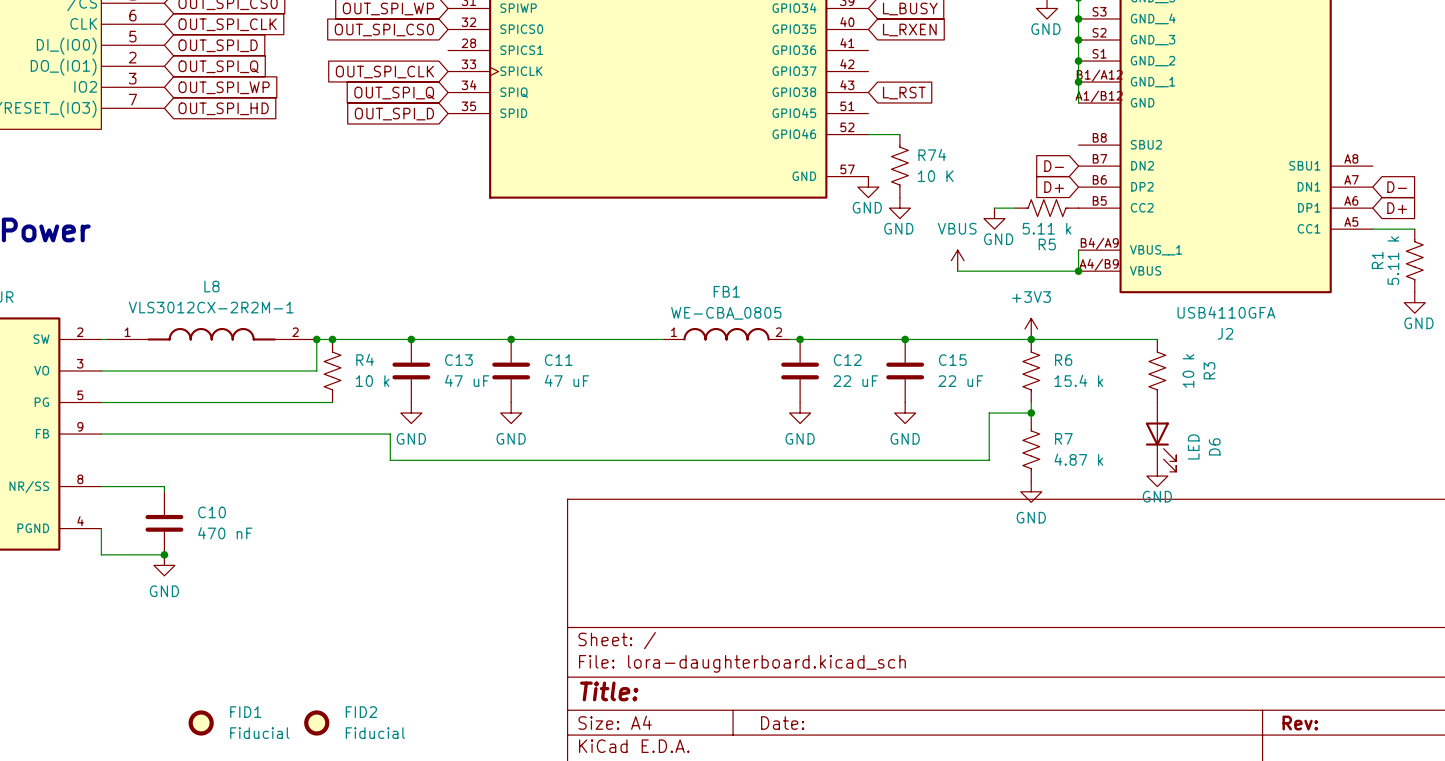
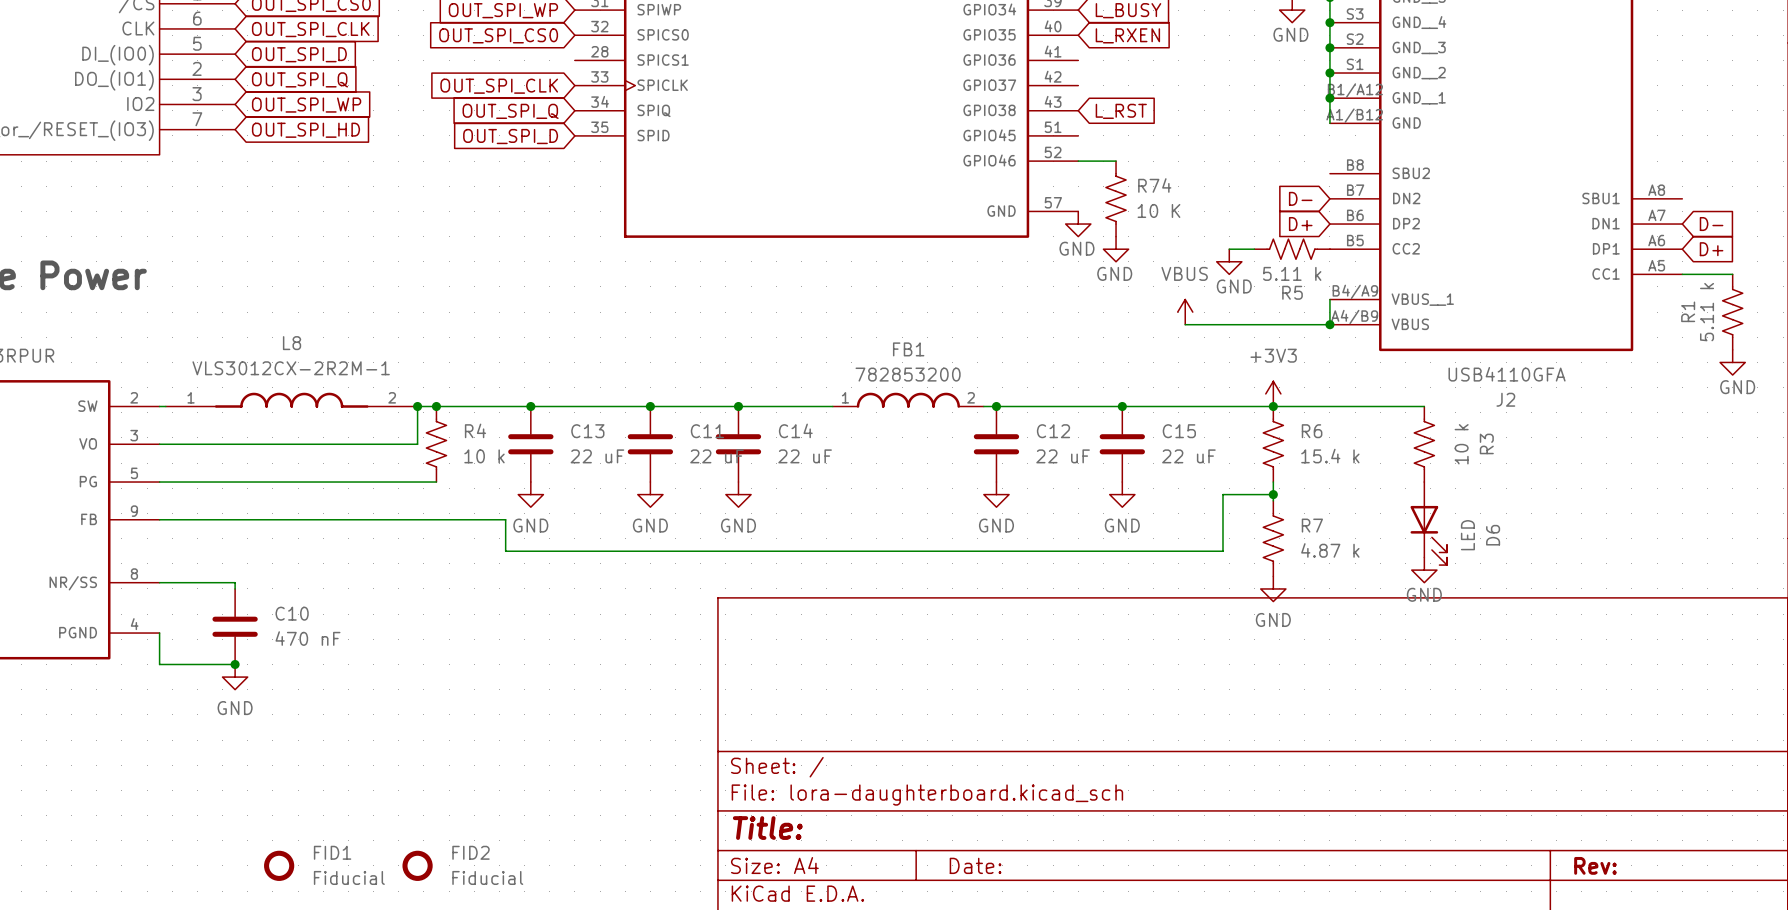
FB1 value: WE-CBA_0805 (726, 313) -> 782853200 (908, 374)
junction: none -> (738, 406)
C14: none -> 22 uF (738, 444)
C13 value: 47 uF (467, 380) -> 22 uF (597, 456)
C11 value: 47 uF (567, 380) -> 22 uF (717, 456)
power symbol: none -> GND (738, 494)

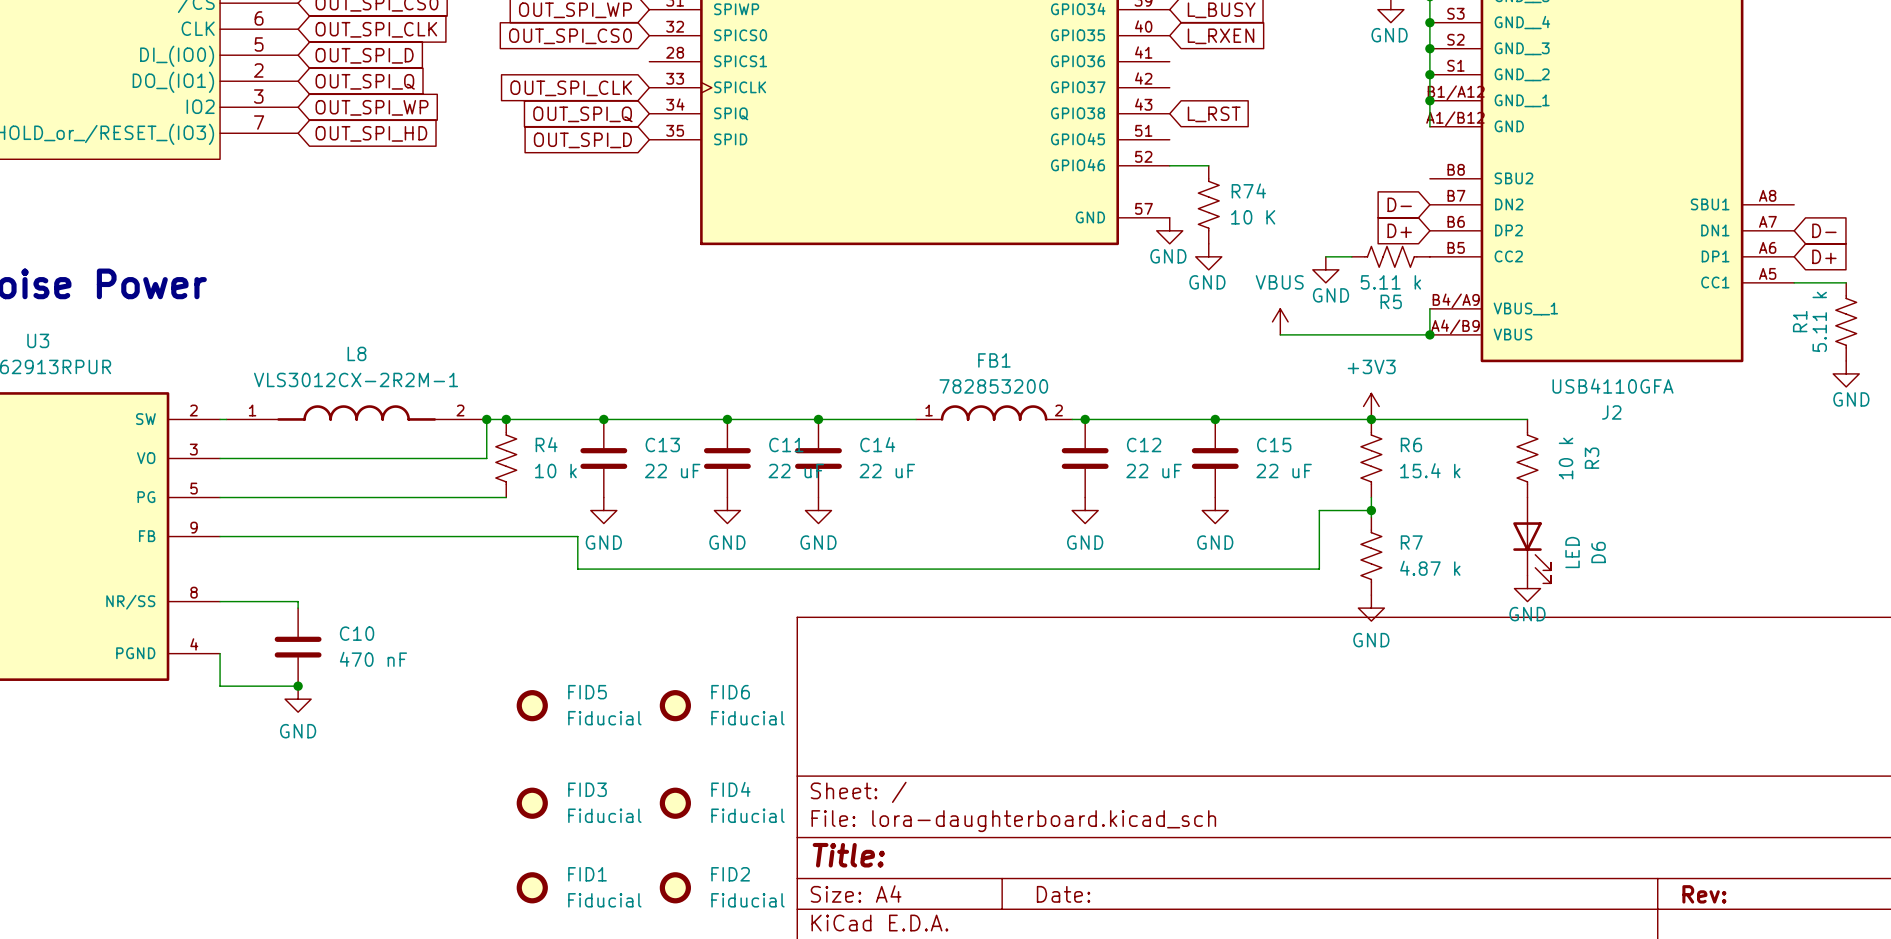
FID5: none -> Fiducial (532, 705)
FID6: none -> Fiducial (675, 705)
FID3: none -> Fiducial (532, 803)
FID4: none -> Fiducial (675, 803)
FID1 position: (279, 865) -> (532, 887)
FID2 position: (417, 865) -> (675, 887)

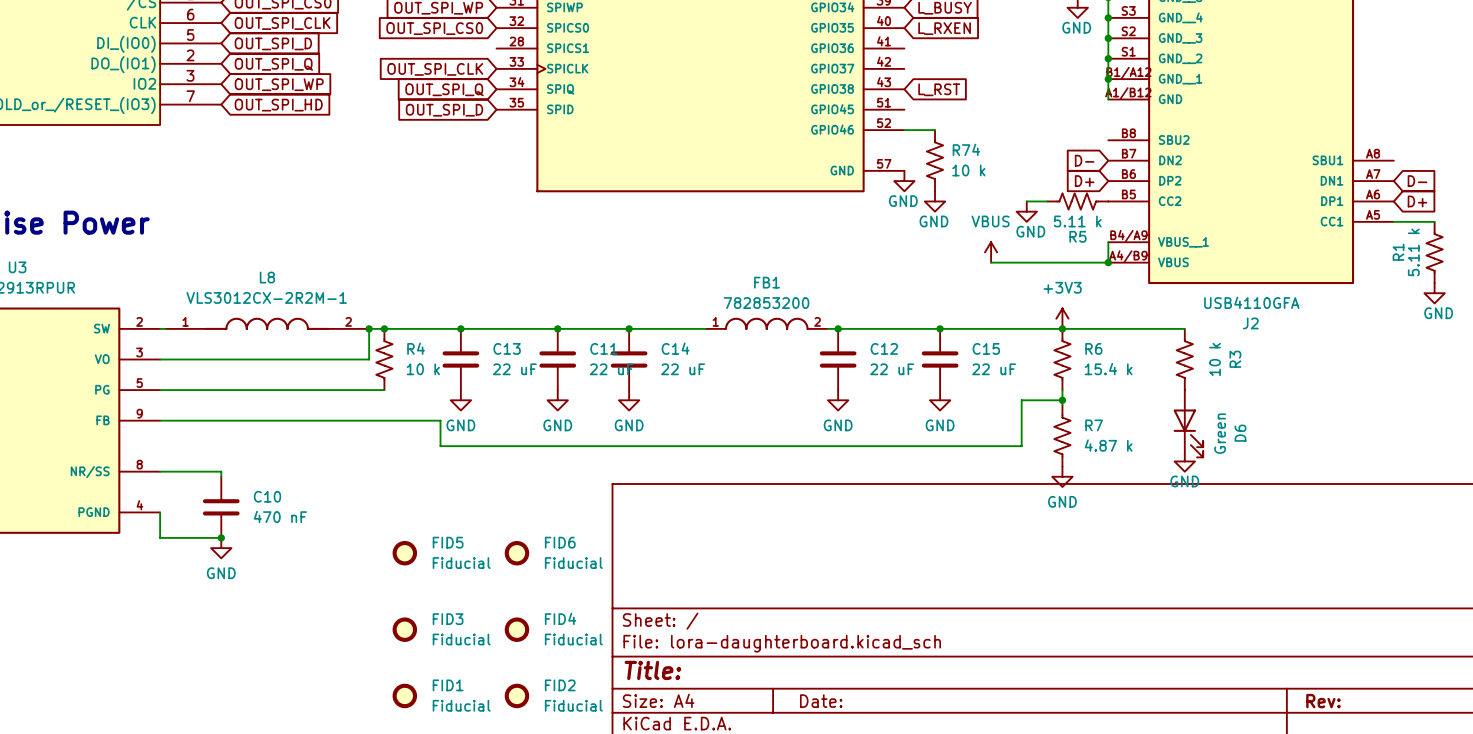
R74 value: 10 K (1253, 217) -> 10 k (968, 170)
D6 value: LED (1572, 552) -> Green (1220, 433)

